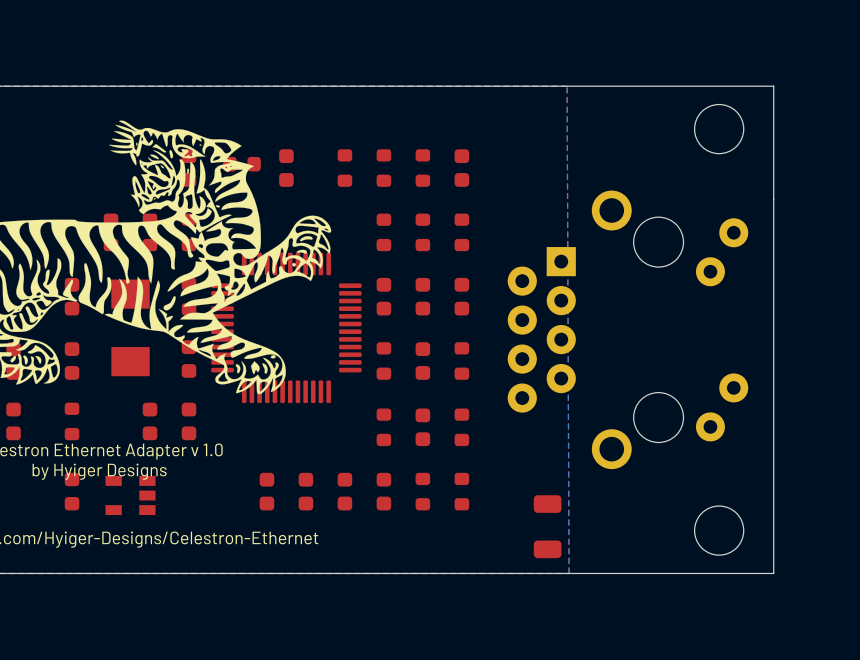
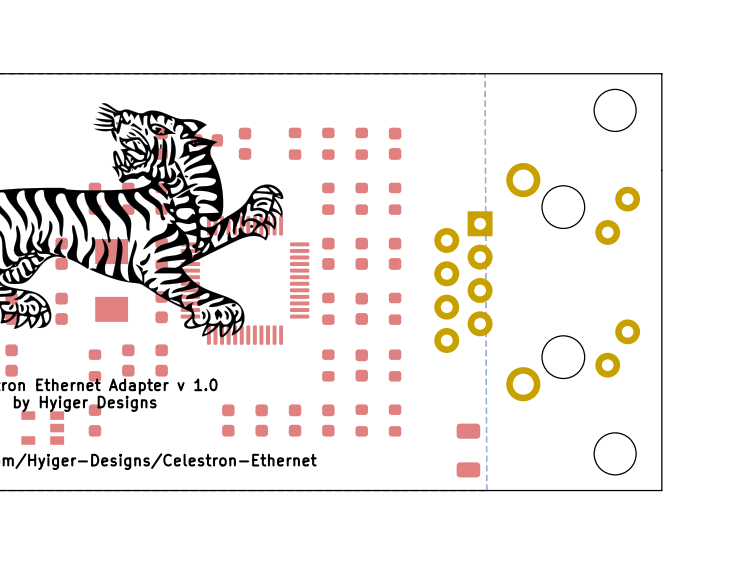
part position: (72, 421) -> (94, 365)
part position: (72, 491) -> (94, 420)
part position: (130, 495) -> (42, 428)

